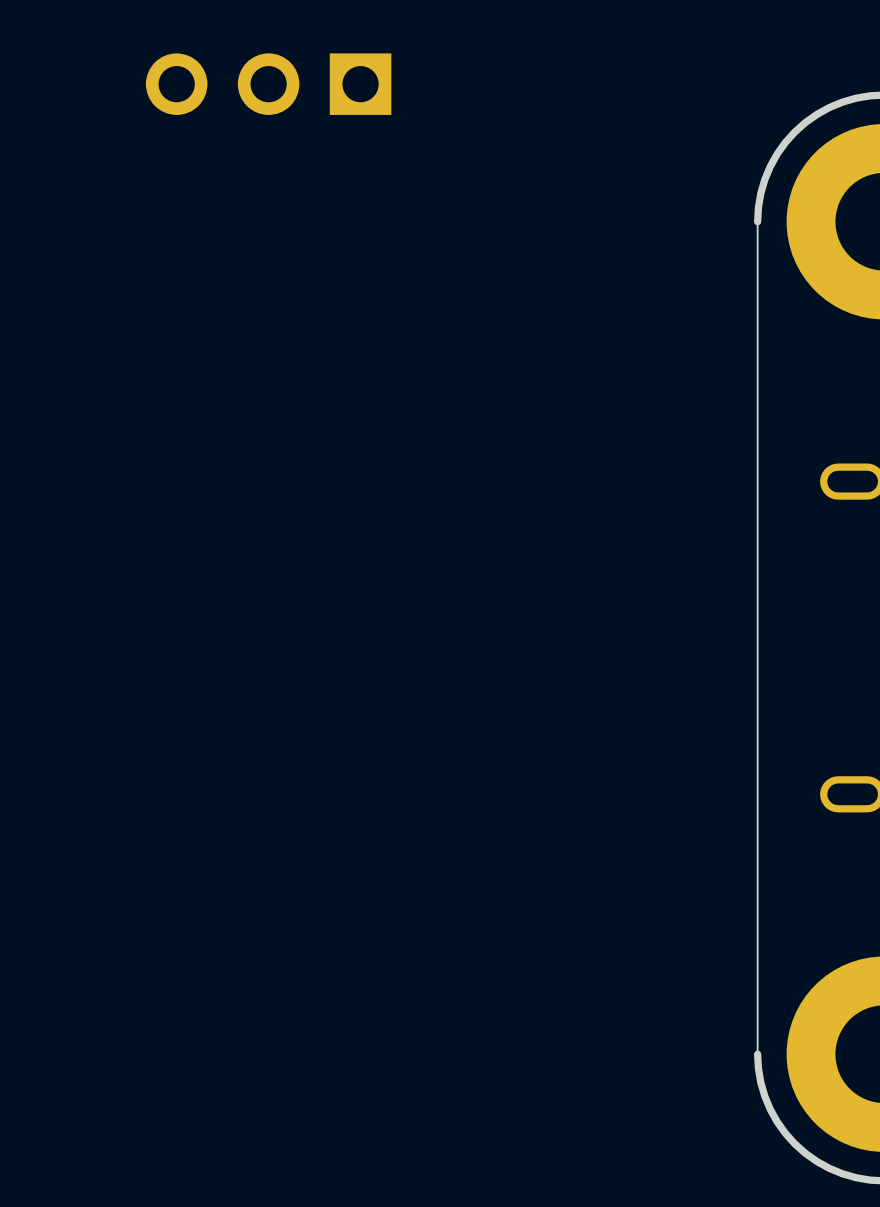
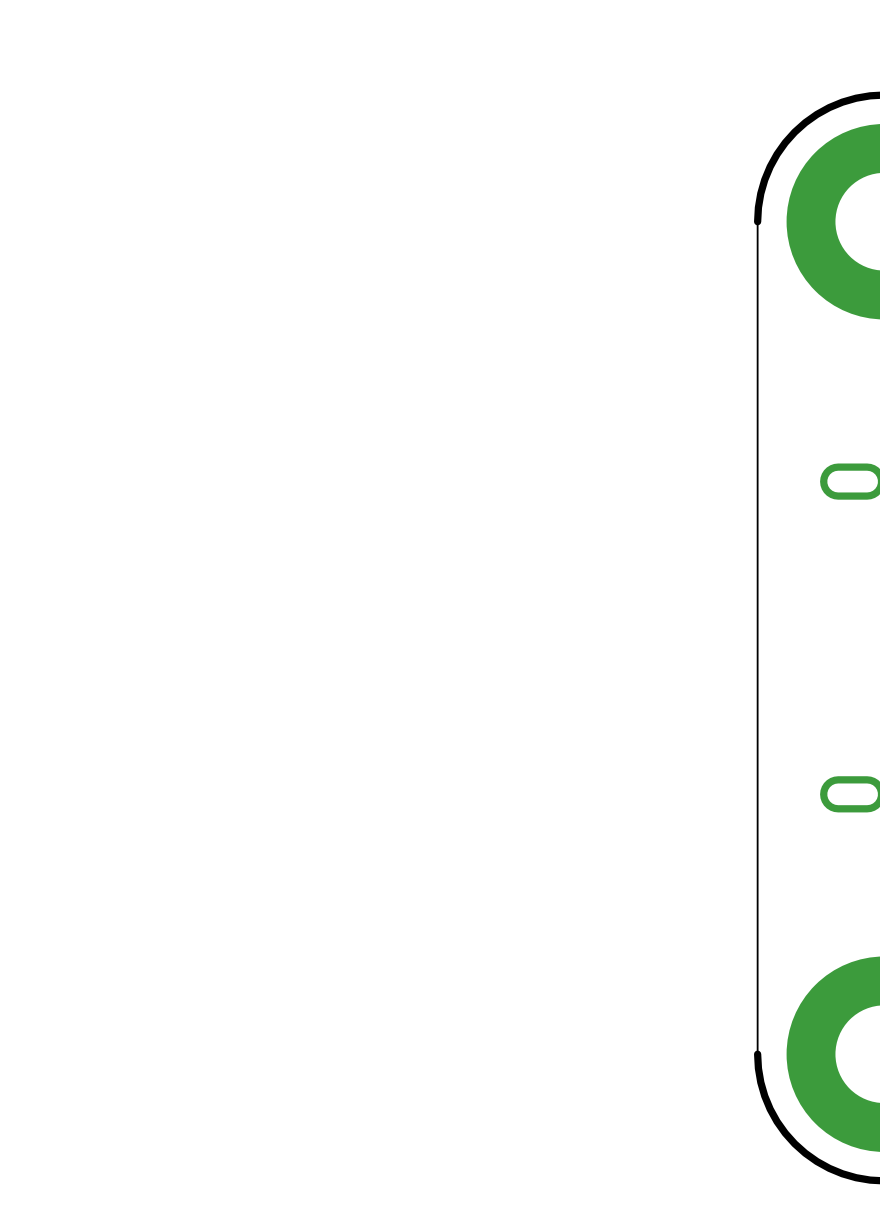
part: (268, 84) -> none

